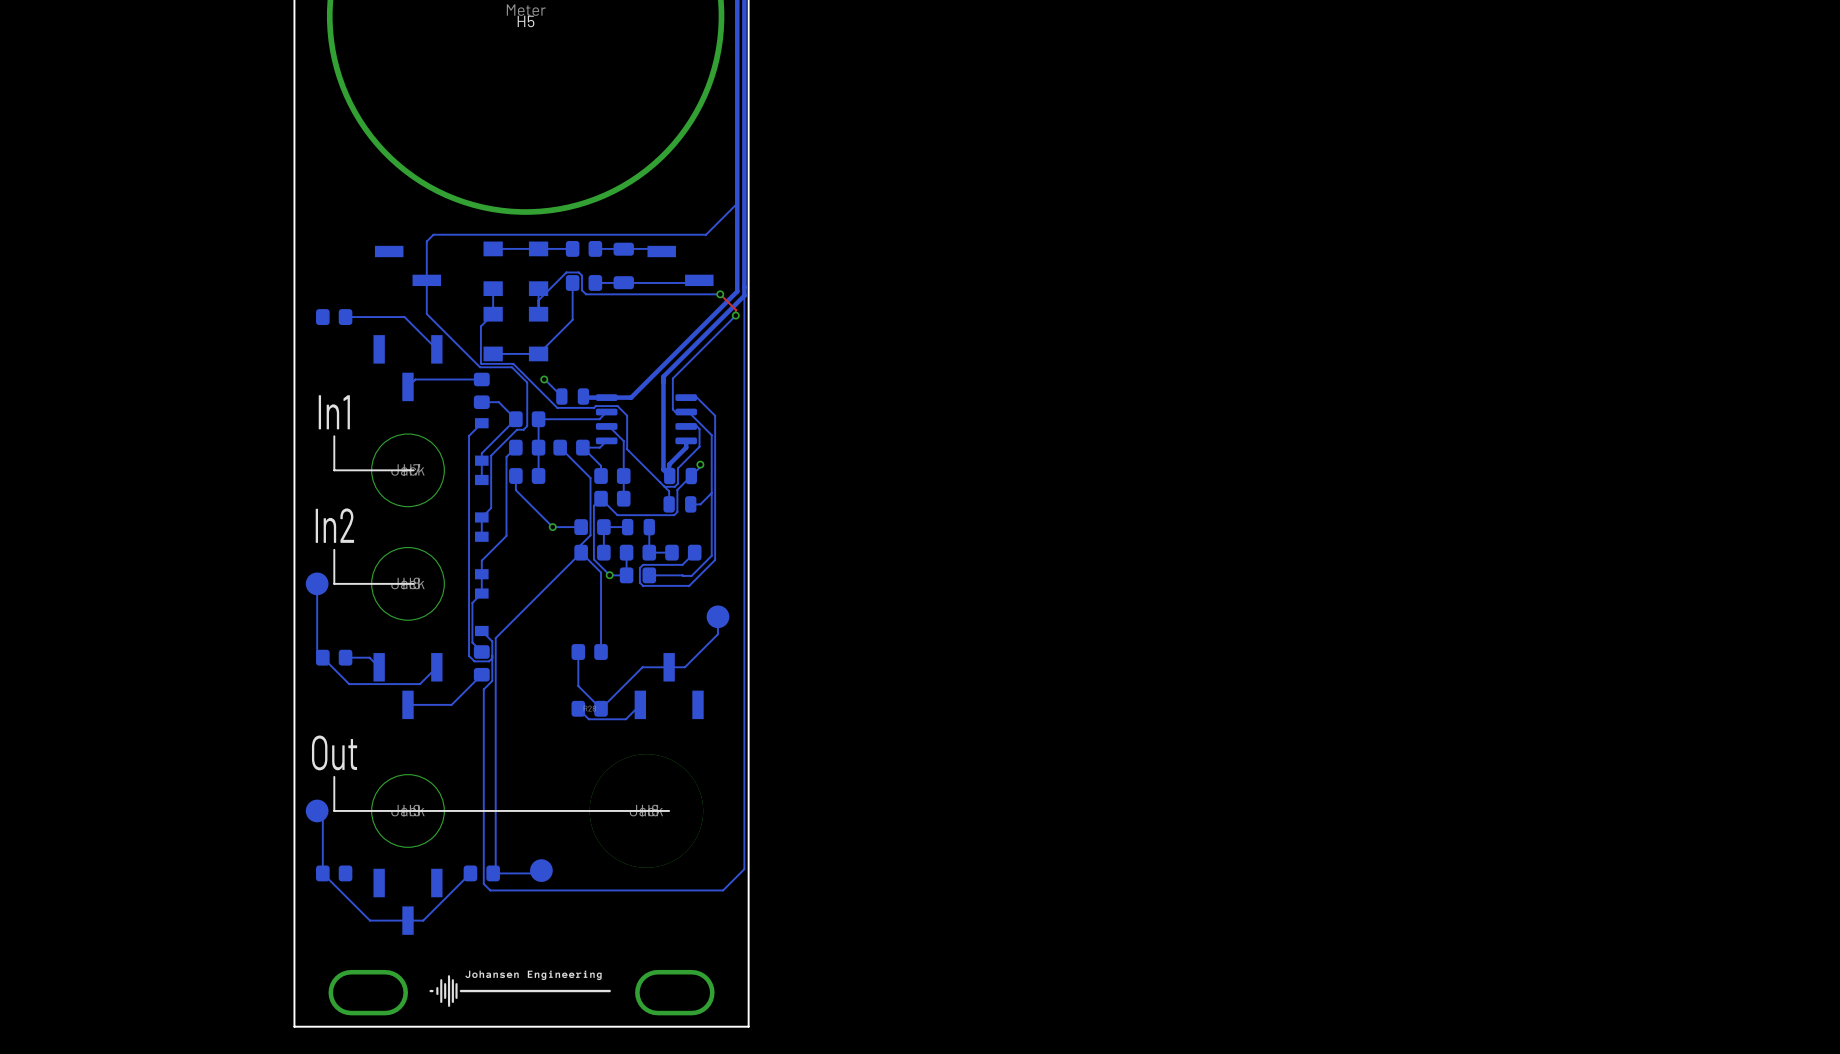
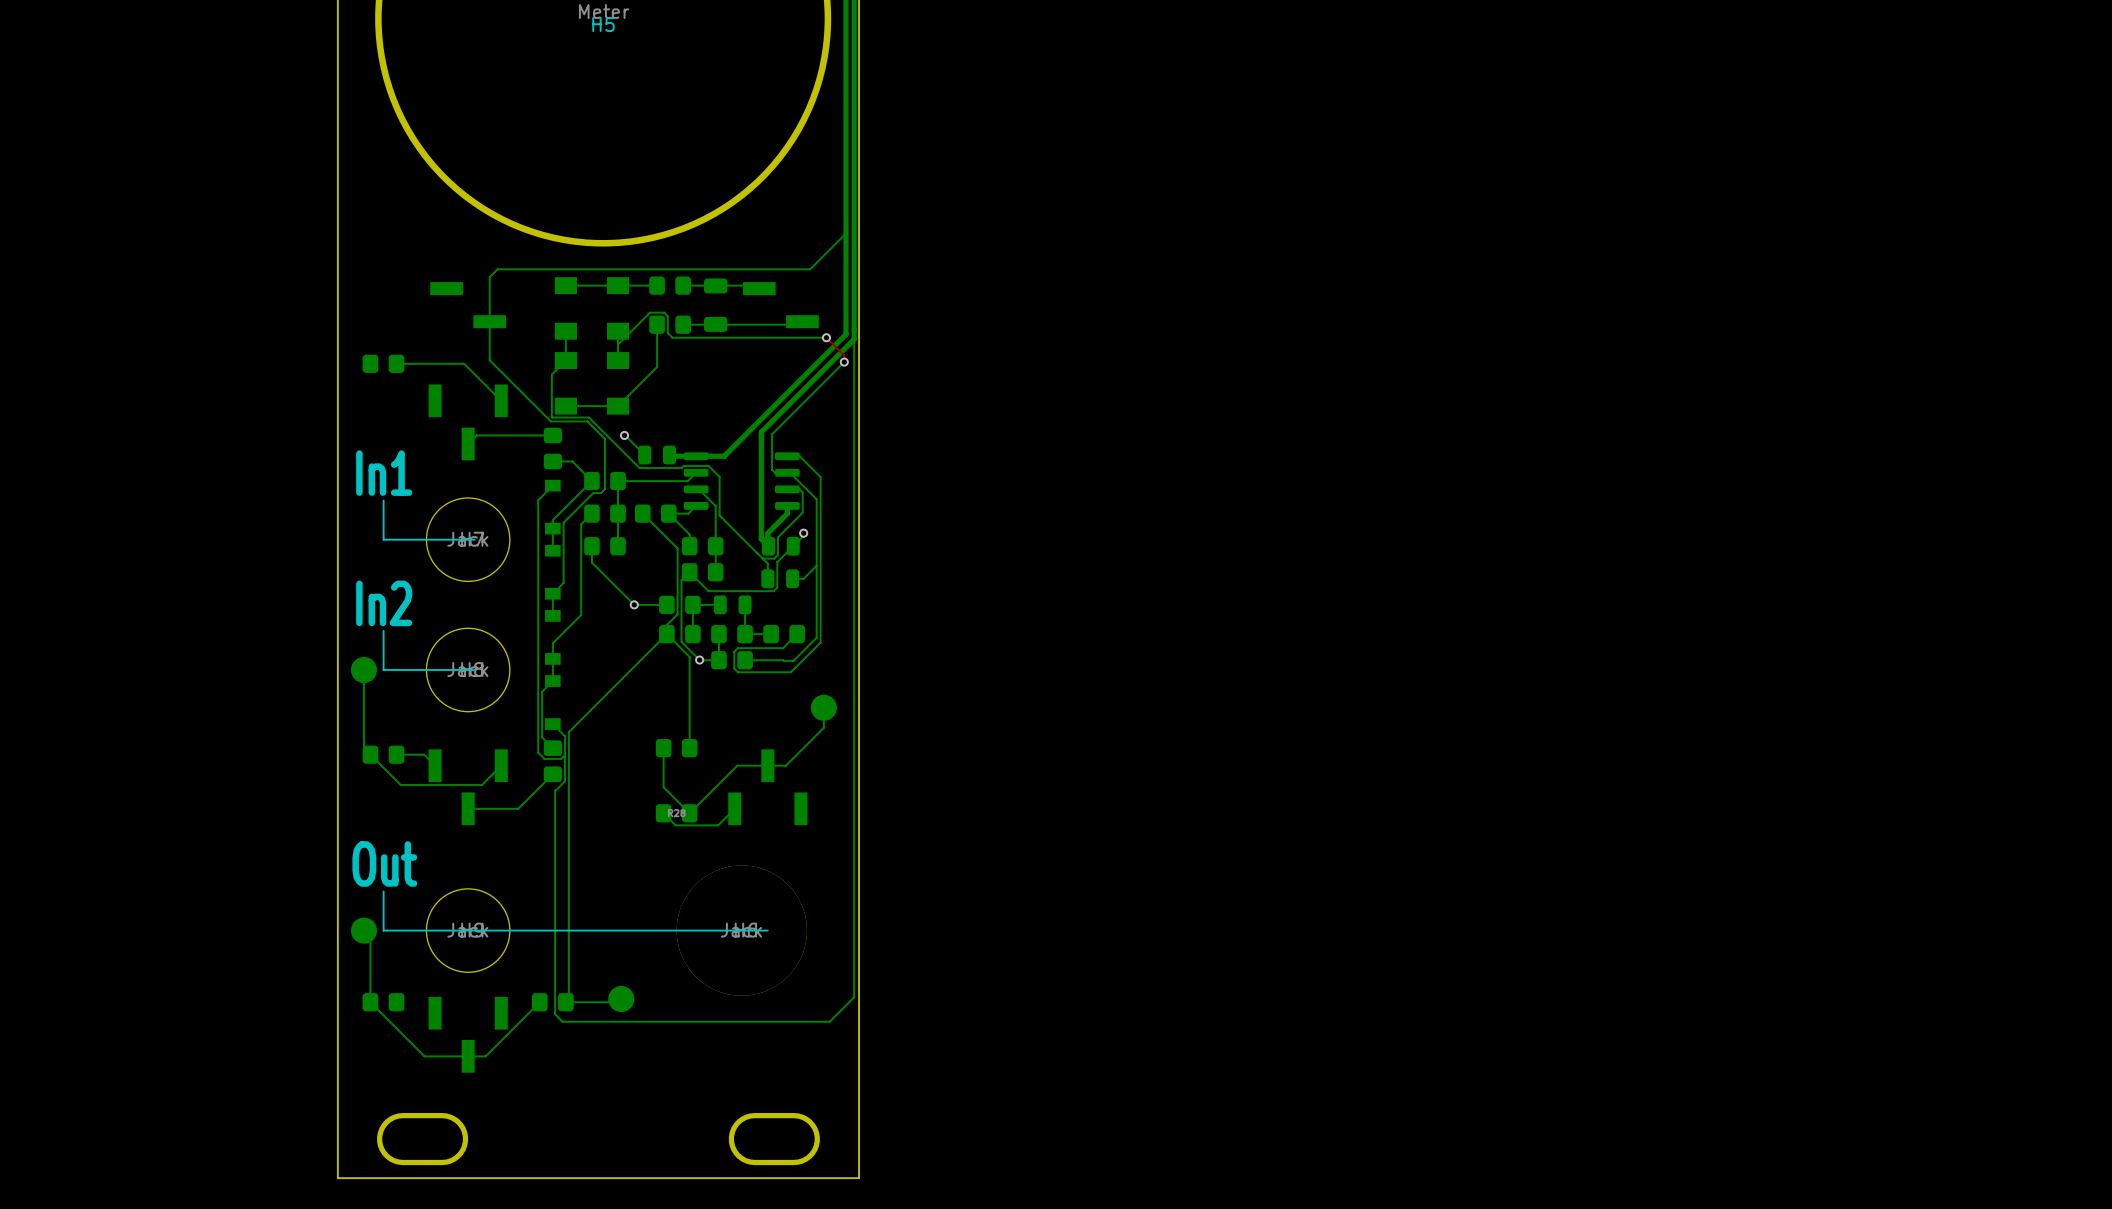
drawing: [429, 970, 611, 1007] -> none

